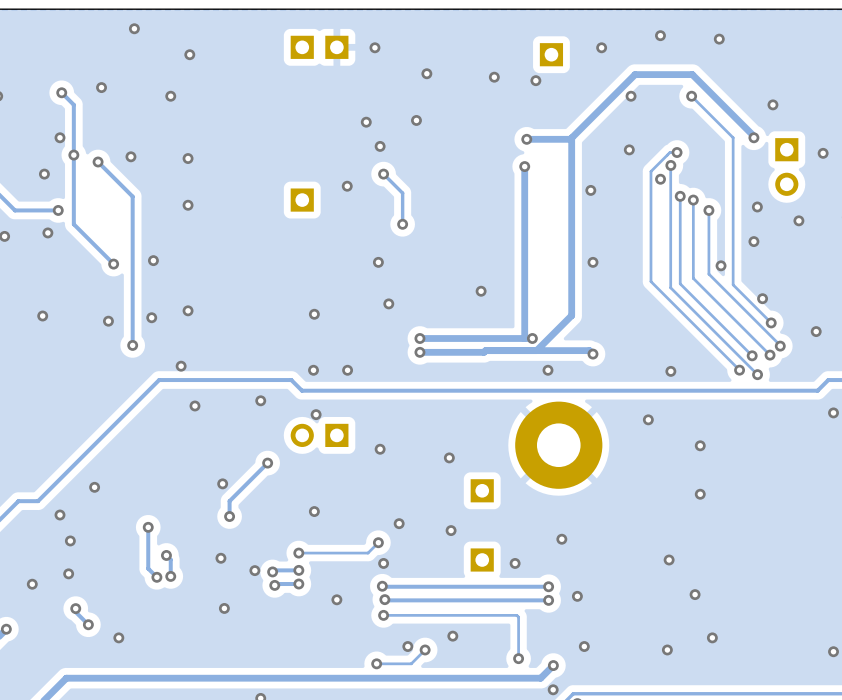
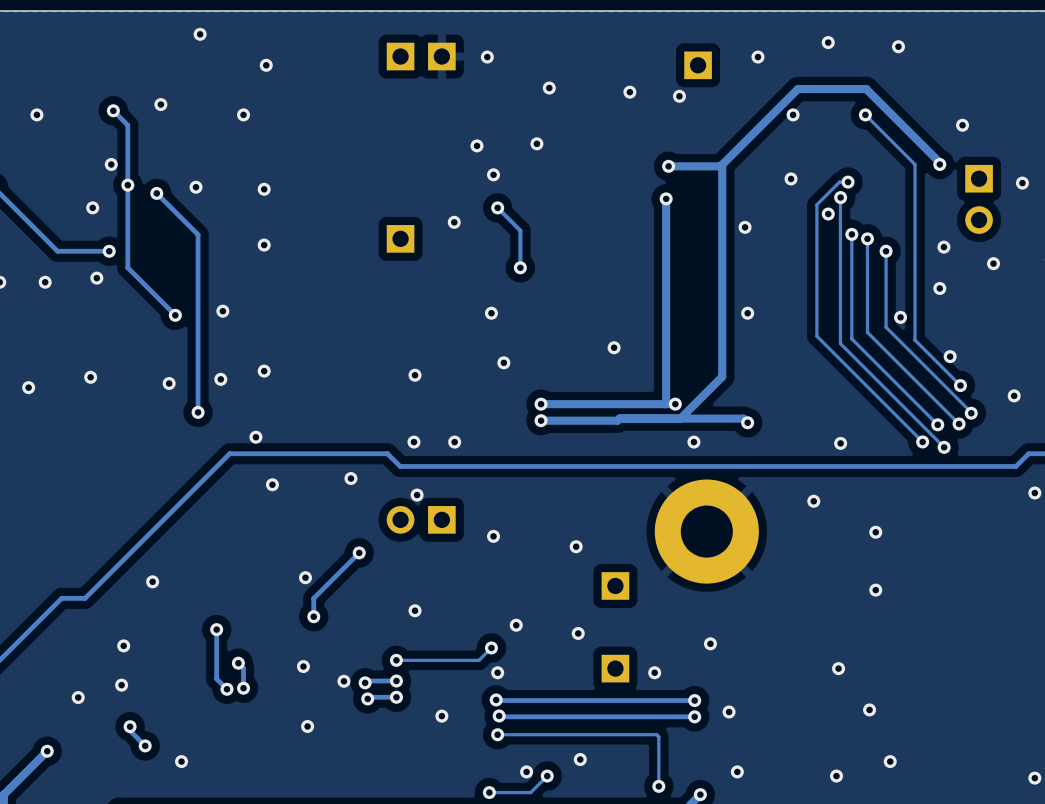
via: (60, 515) -> none

